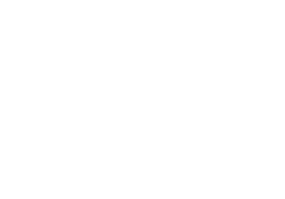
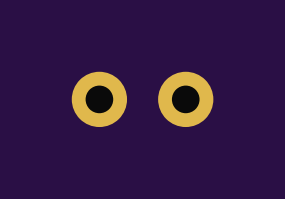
part: none -> (142, 99)

